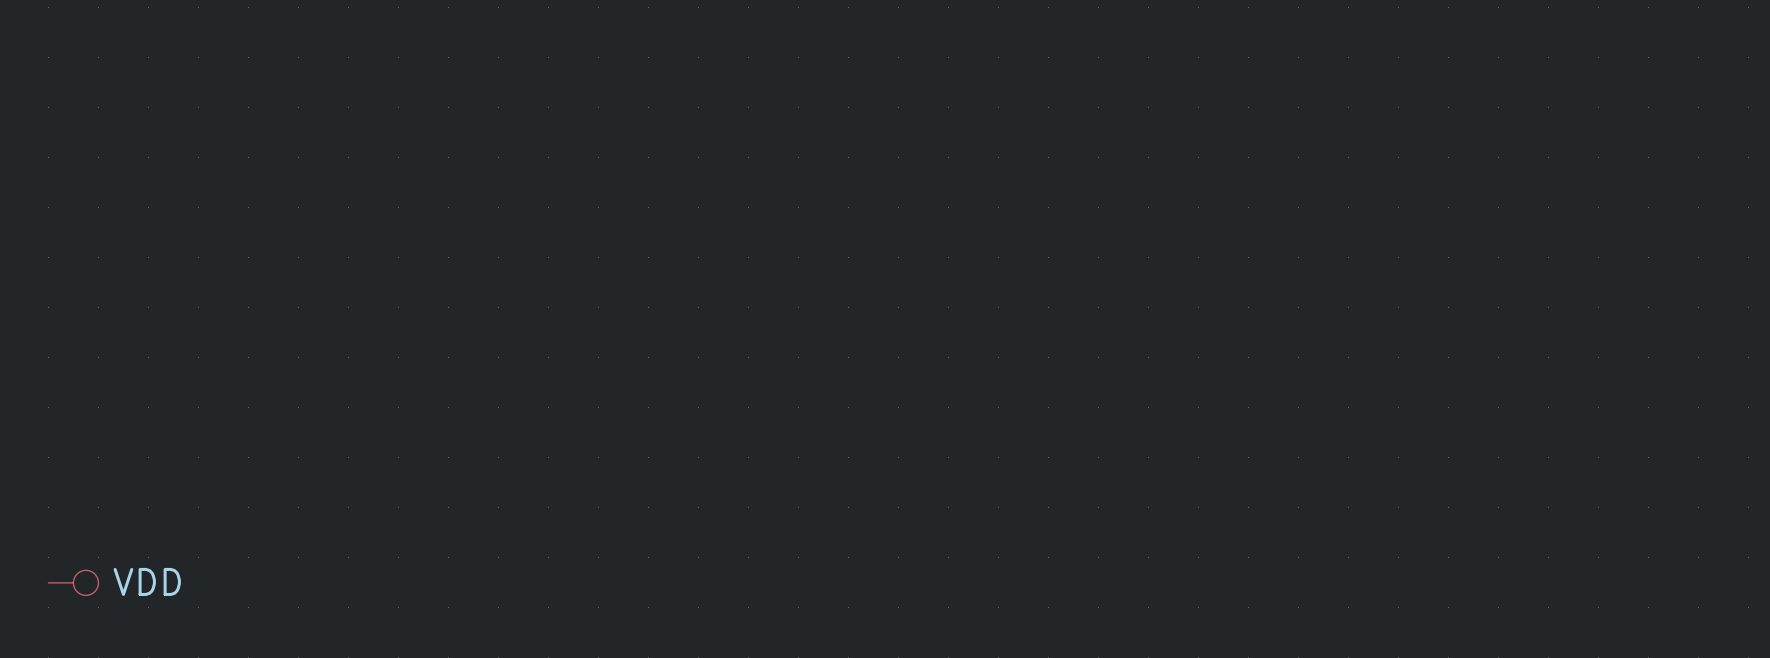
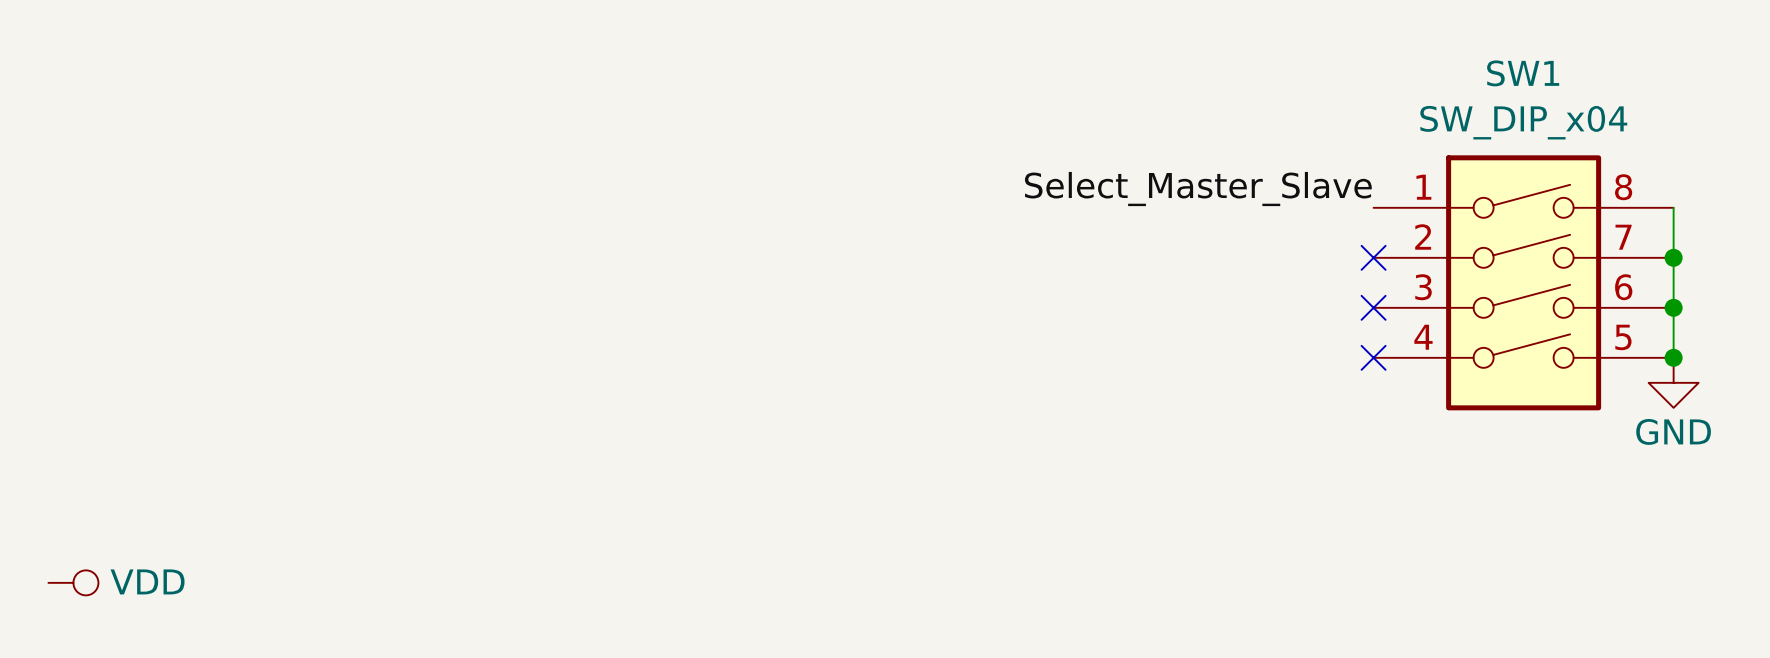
label: none -> Select_Master_Slave (1198, 189)
wire: none -> (1673, 207) (1673, 357)
no-connect mark: none -> (1373, 257)
junction: none -> (1673, 257)
SW1: none -> SW_DIP_x04 (1523, 282)
no-connect mark: none -> (1373, 307)
junction: none -> (1673, 307)
no-connect mark: none -> (1373, 357)
junction: none -> (1673, 357)
power symbol: none -> GND (1673, 382)

